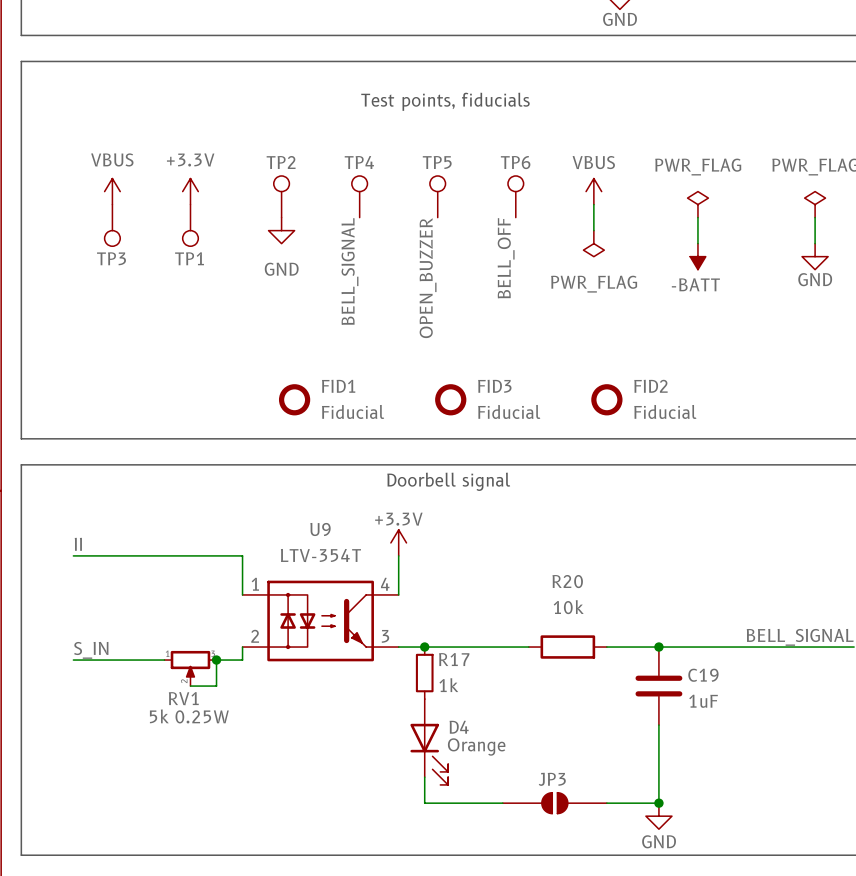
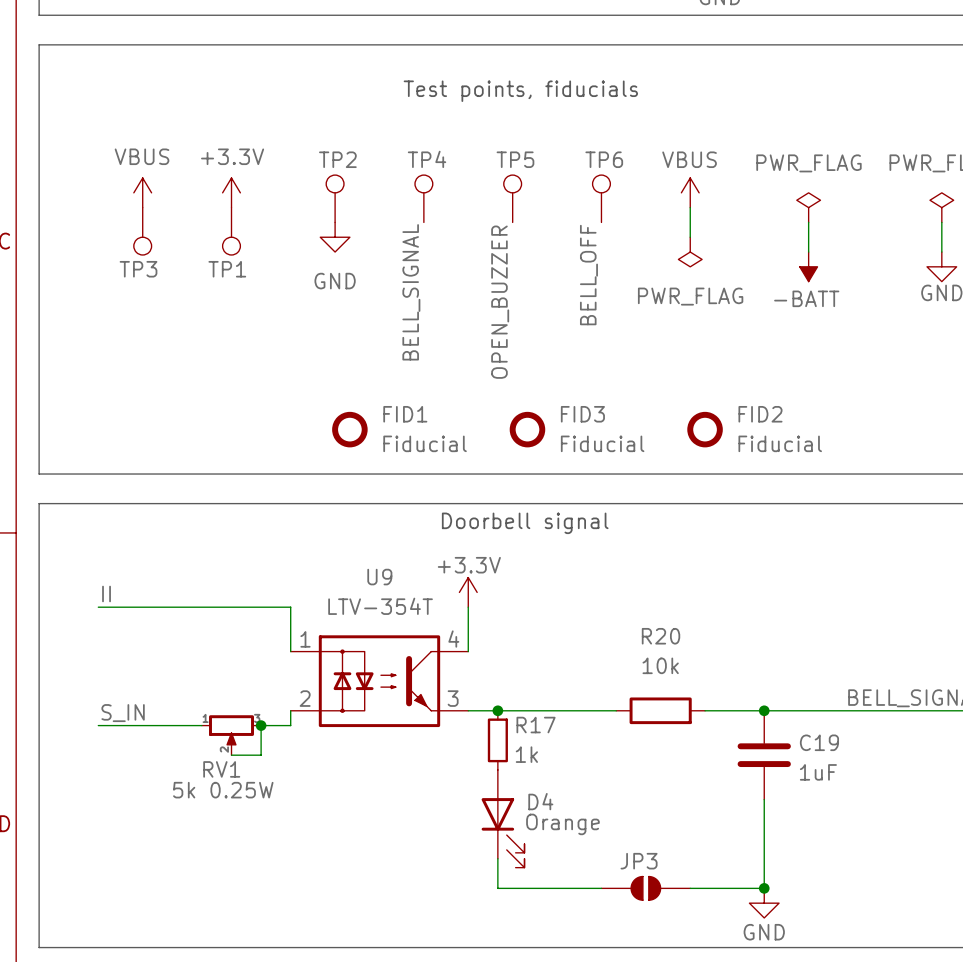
JP3 symbol: [502, 791, 607, 815] -> [601, 876, 691, 901]

